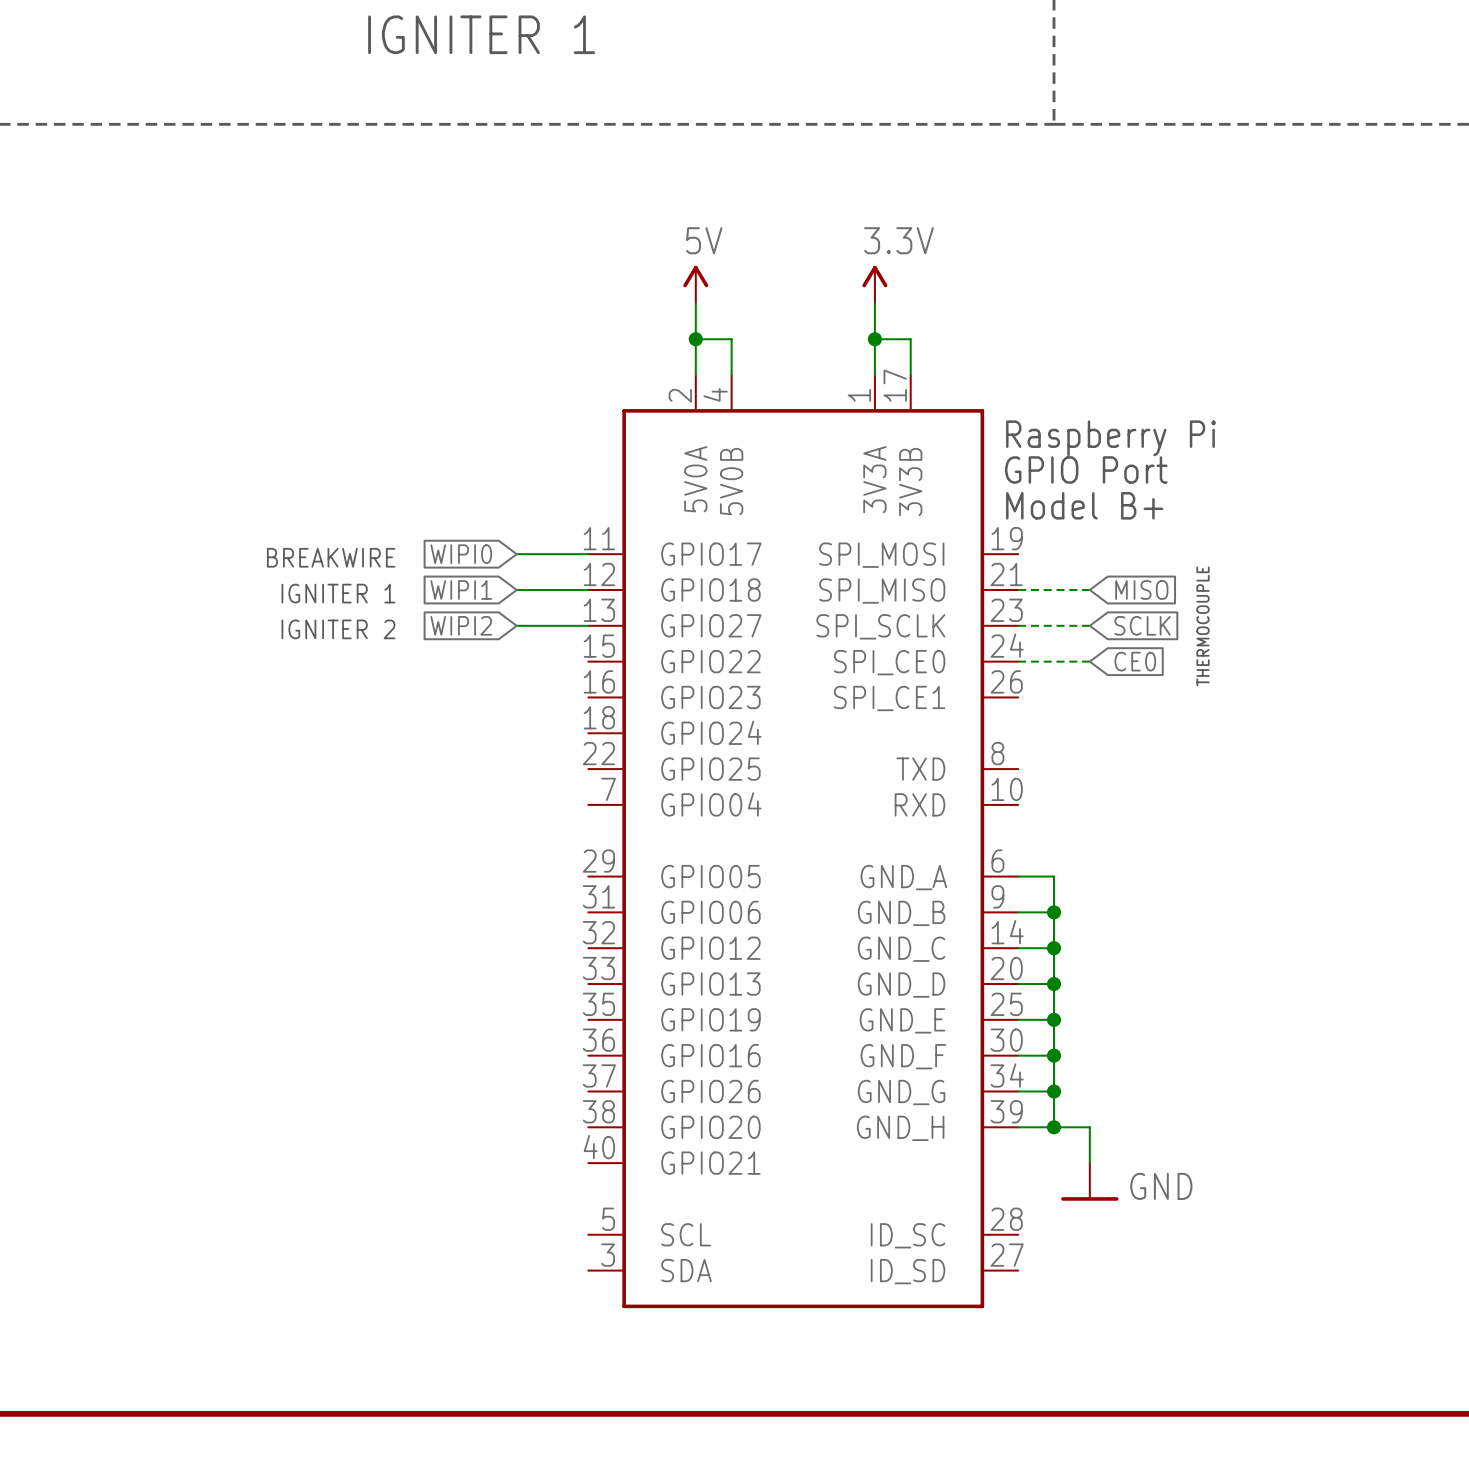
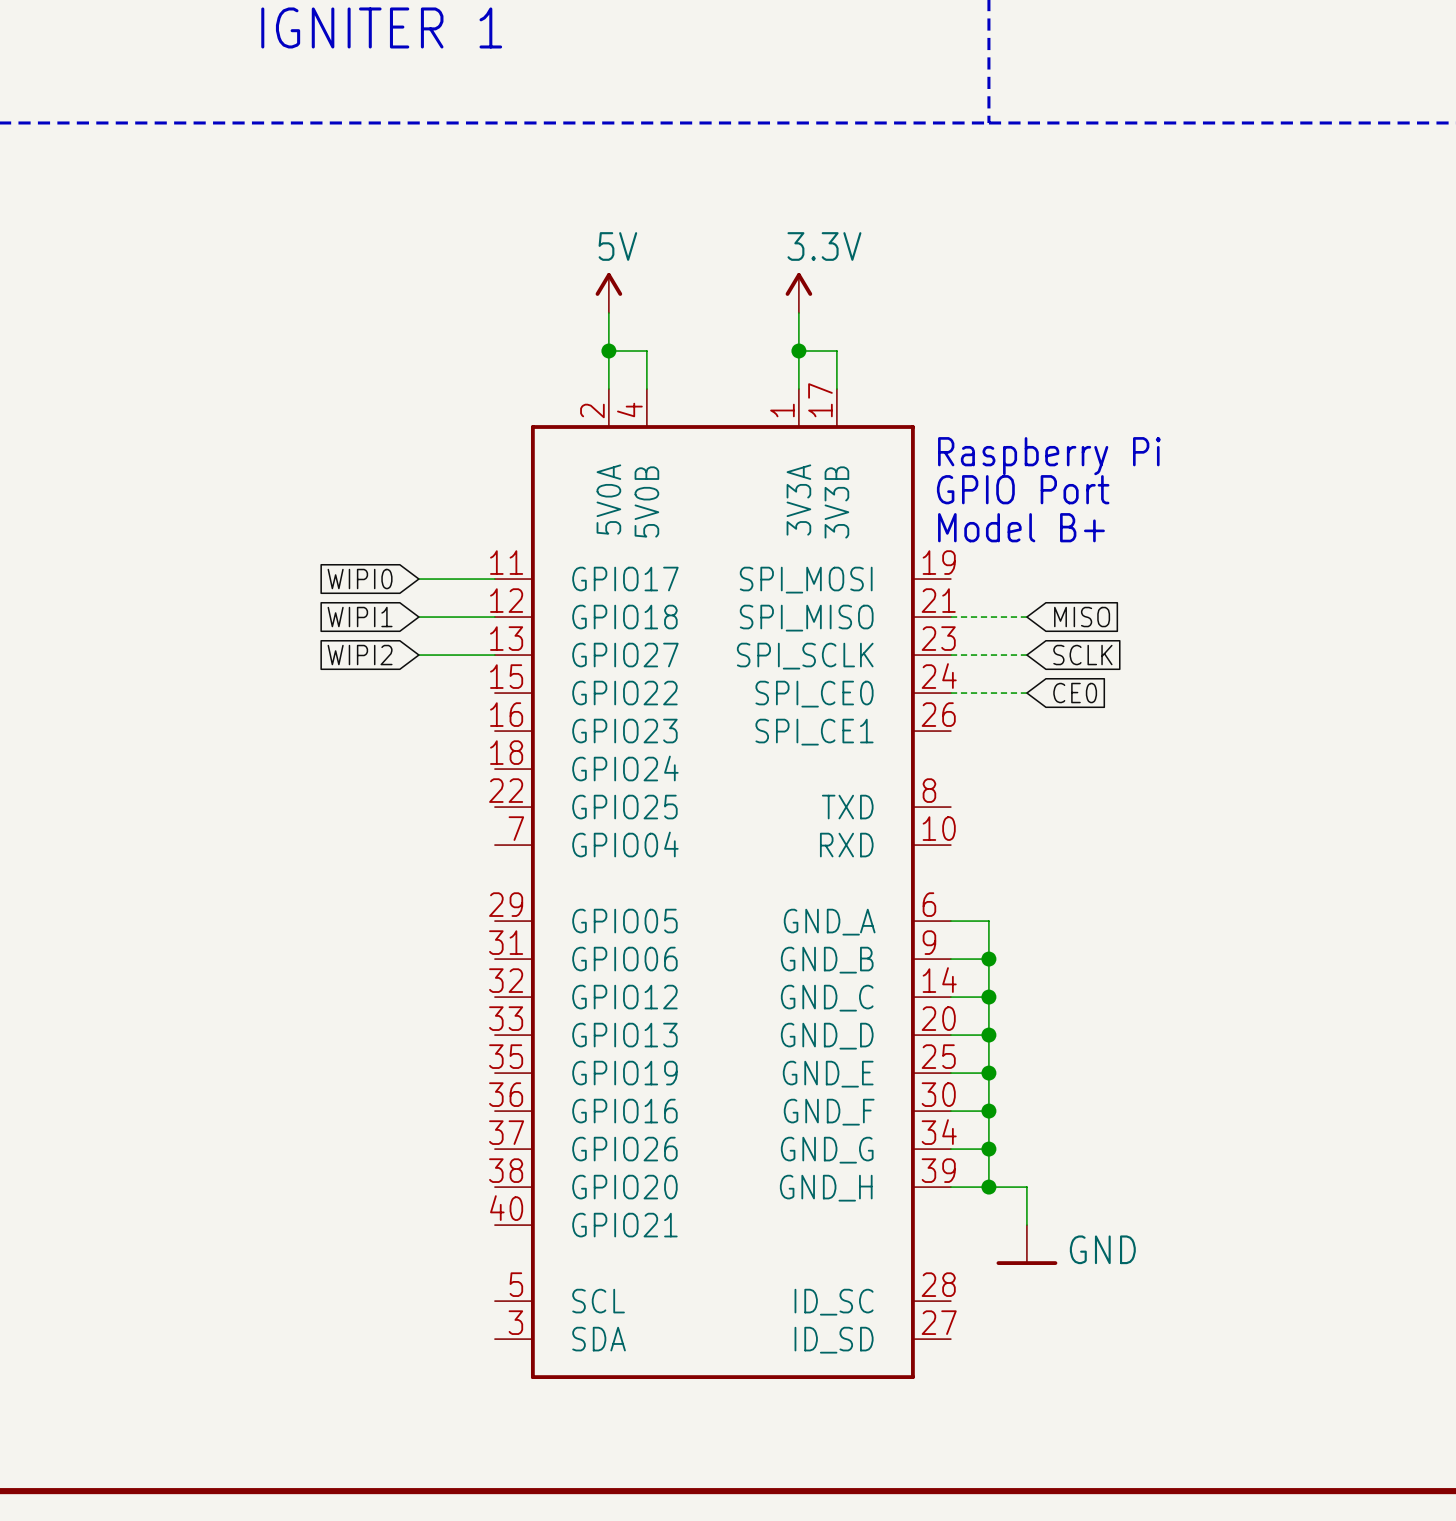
text: BREAKWIRE (331, 557) -> none
text: IGNITER 1 (338, 593) -> none
text: THERMOCOUPLE (1203, 626) -> none
text: IGNITER 2 (338, 629) -> none

